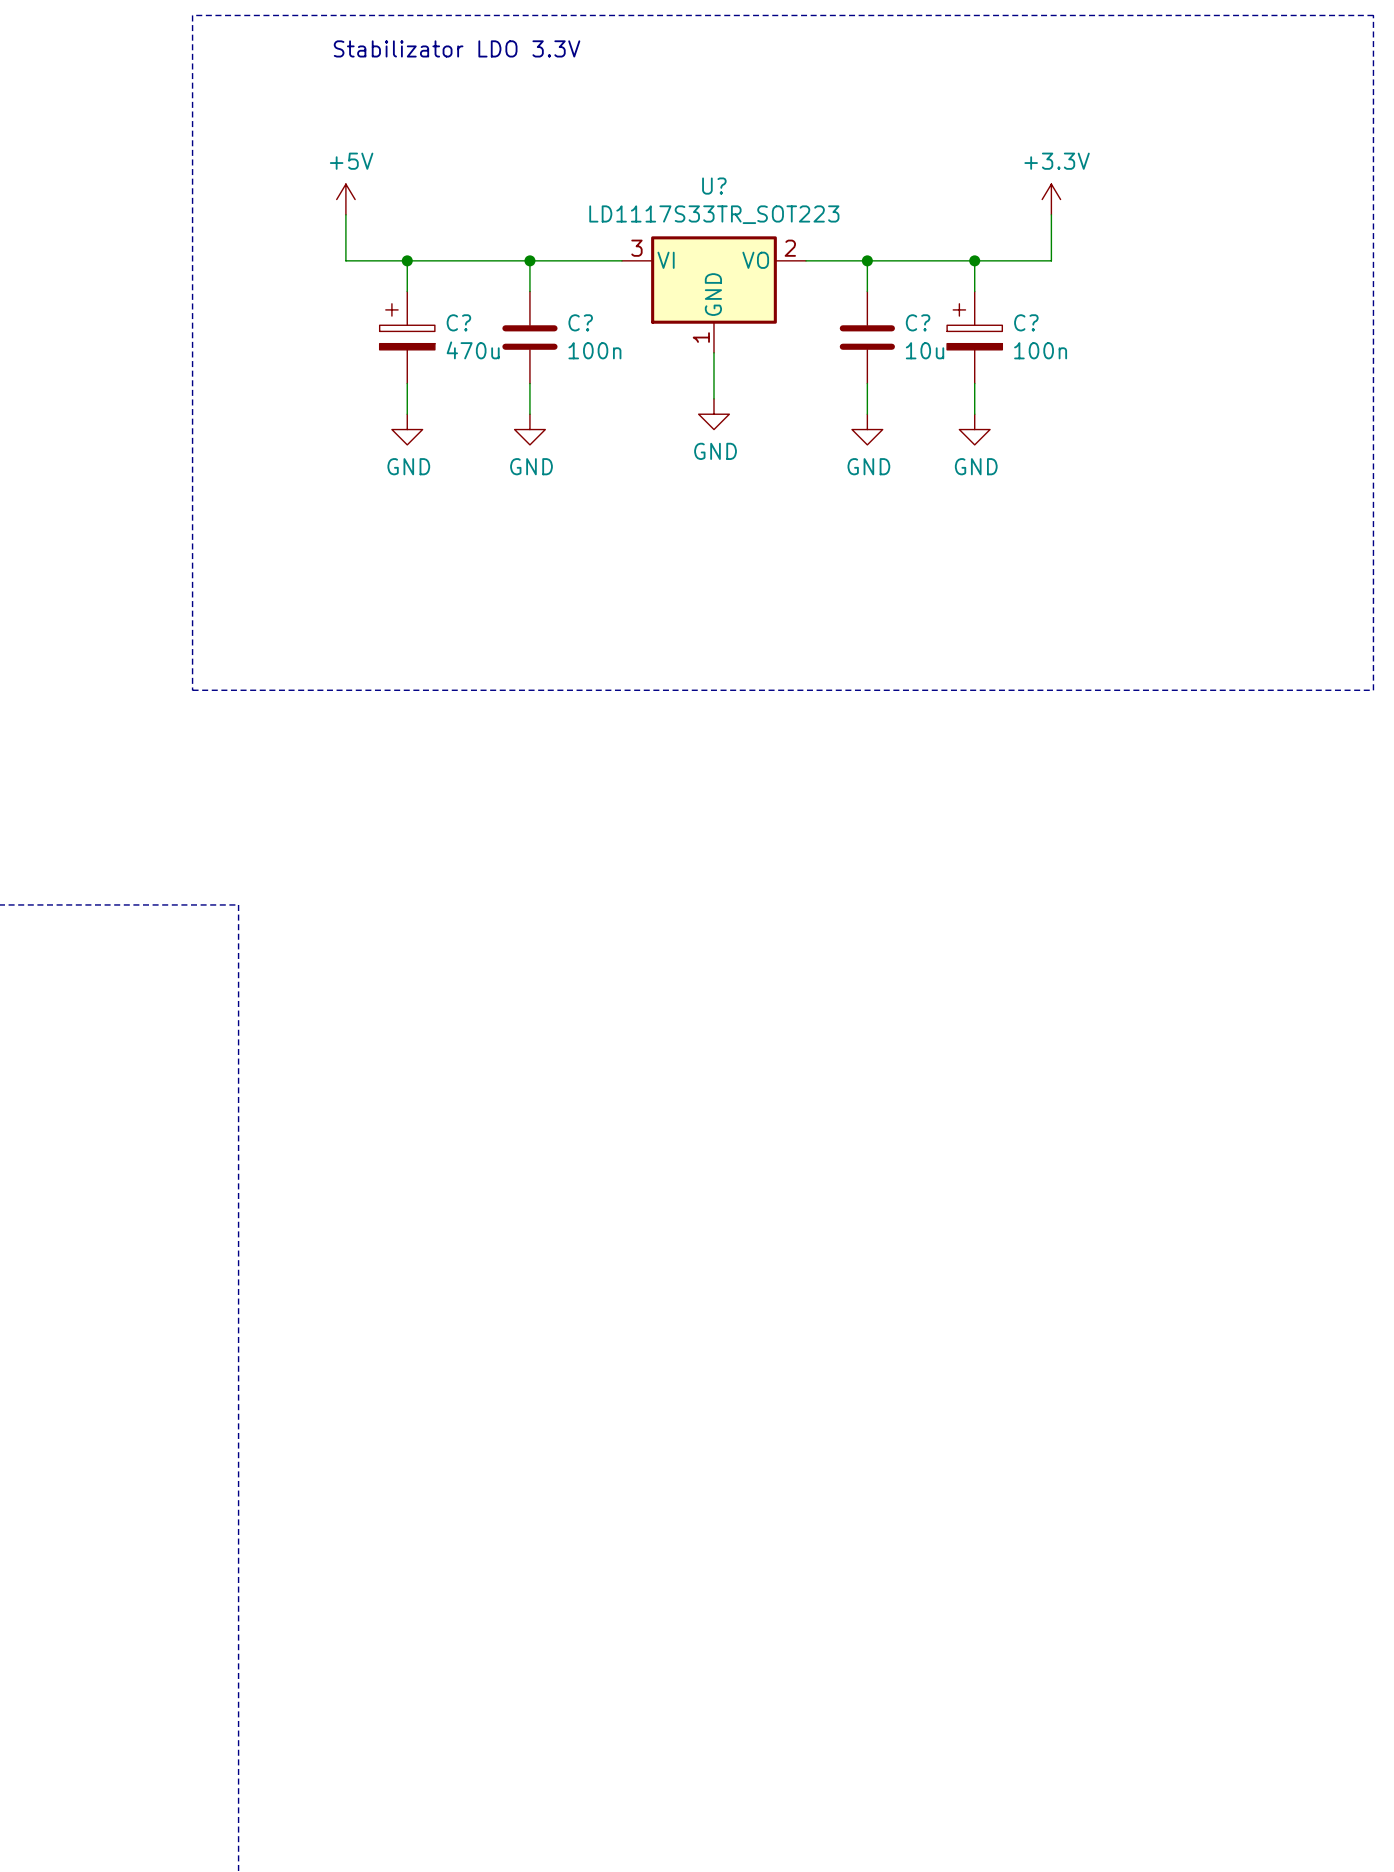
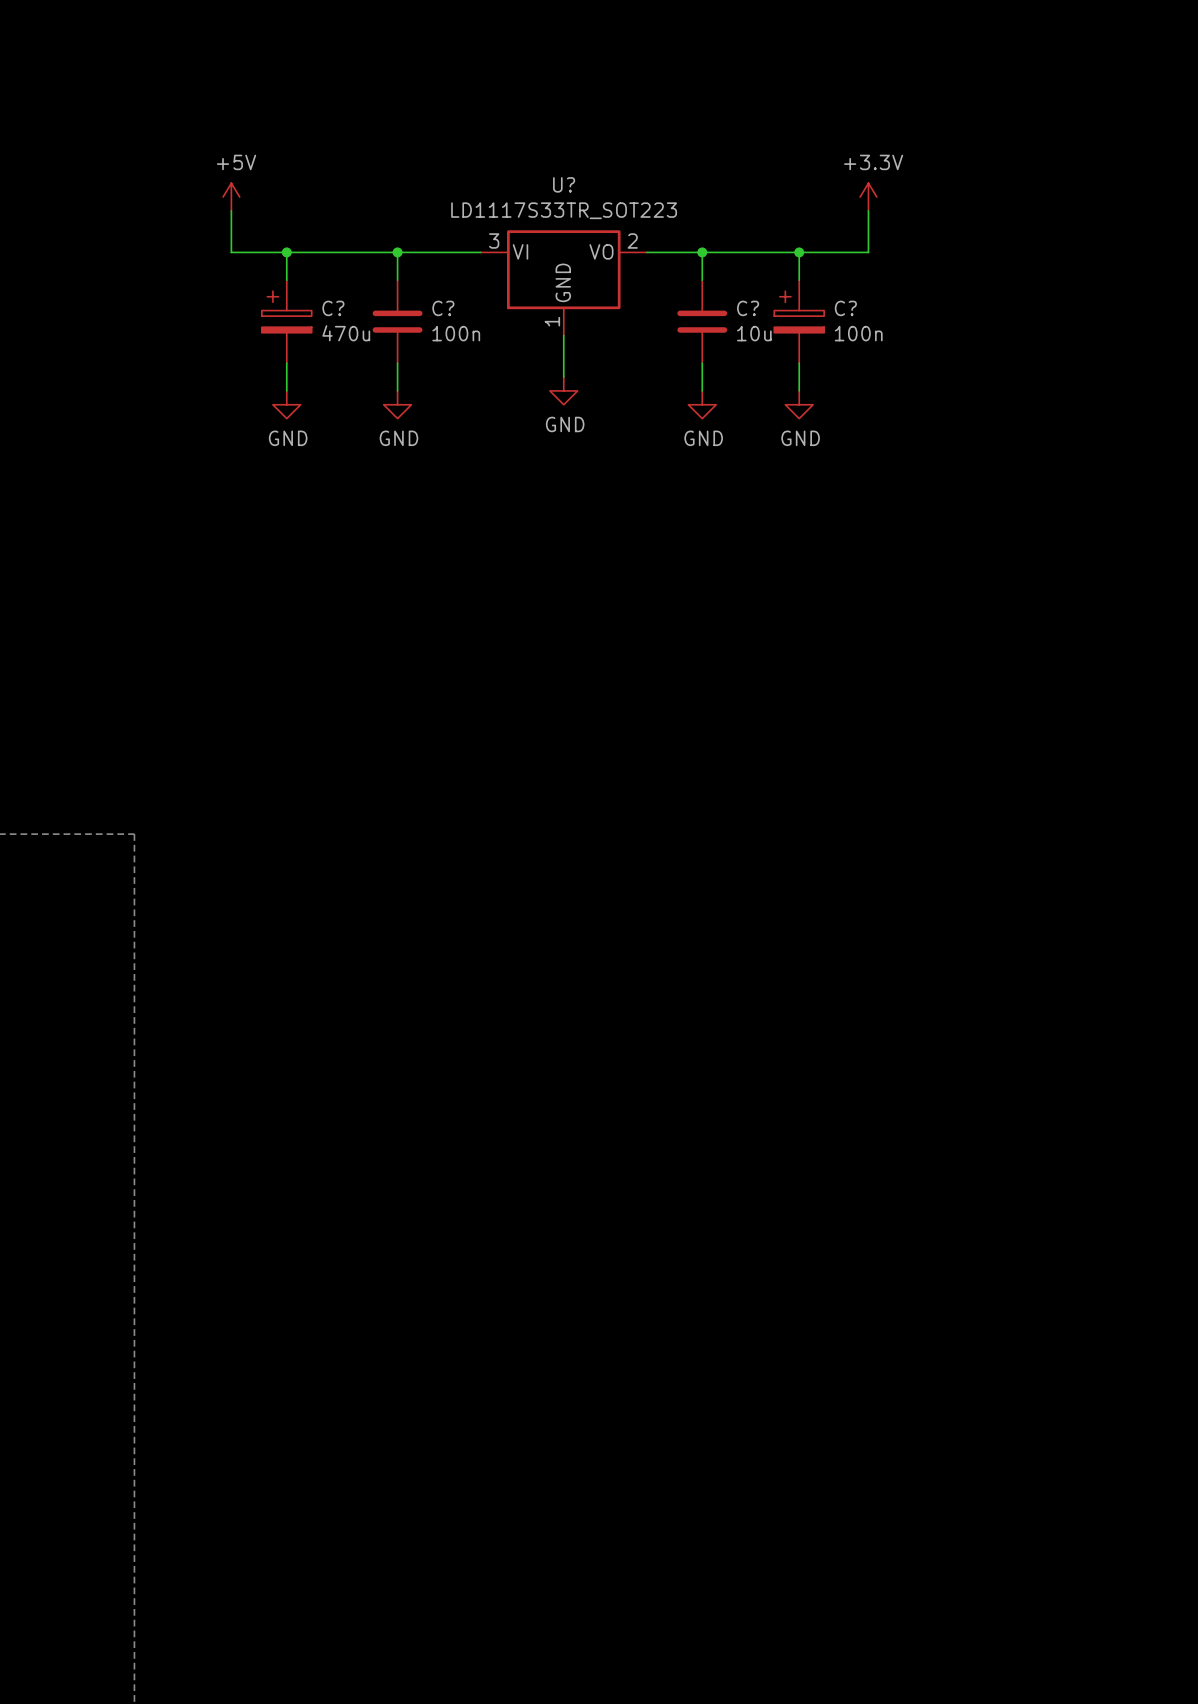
line: (192, 15) (192, 690) (1373, 690) (1373, 15) (192, 15) -> none
text: Stabilizator LDO 3.3V (457, 48) -> none

